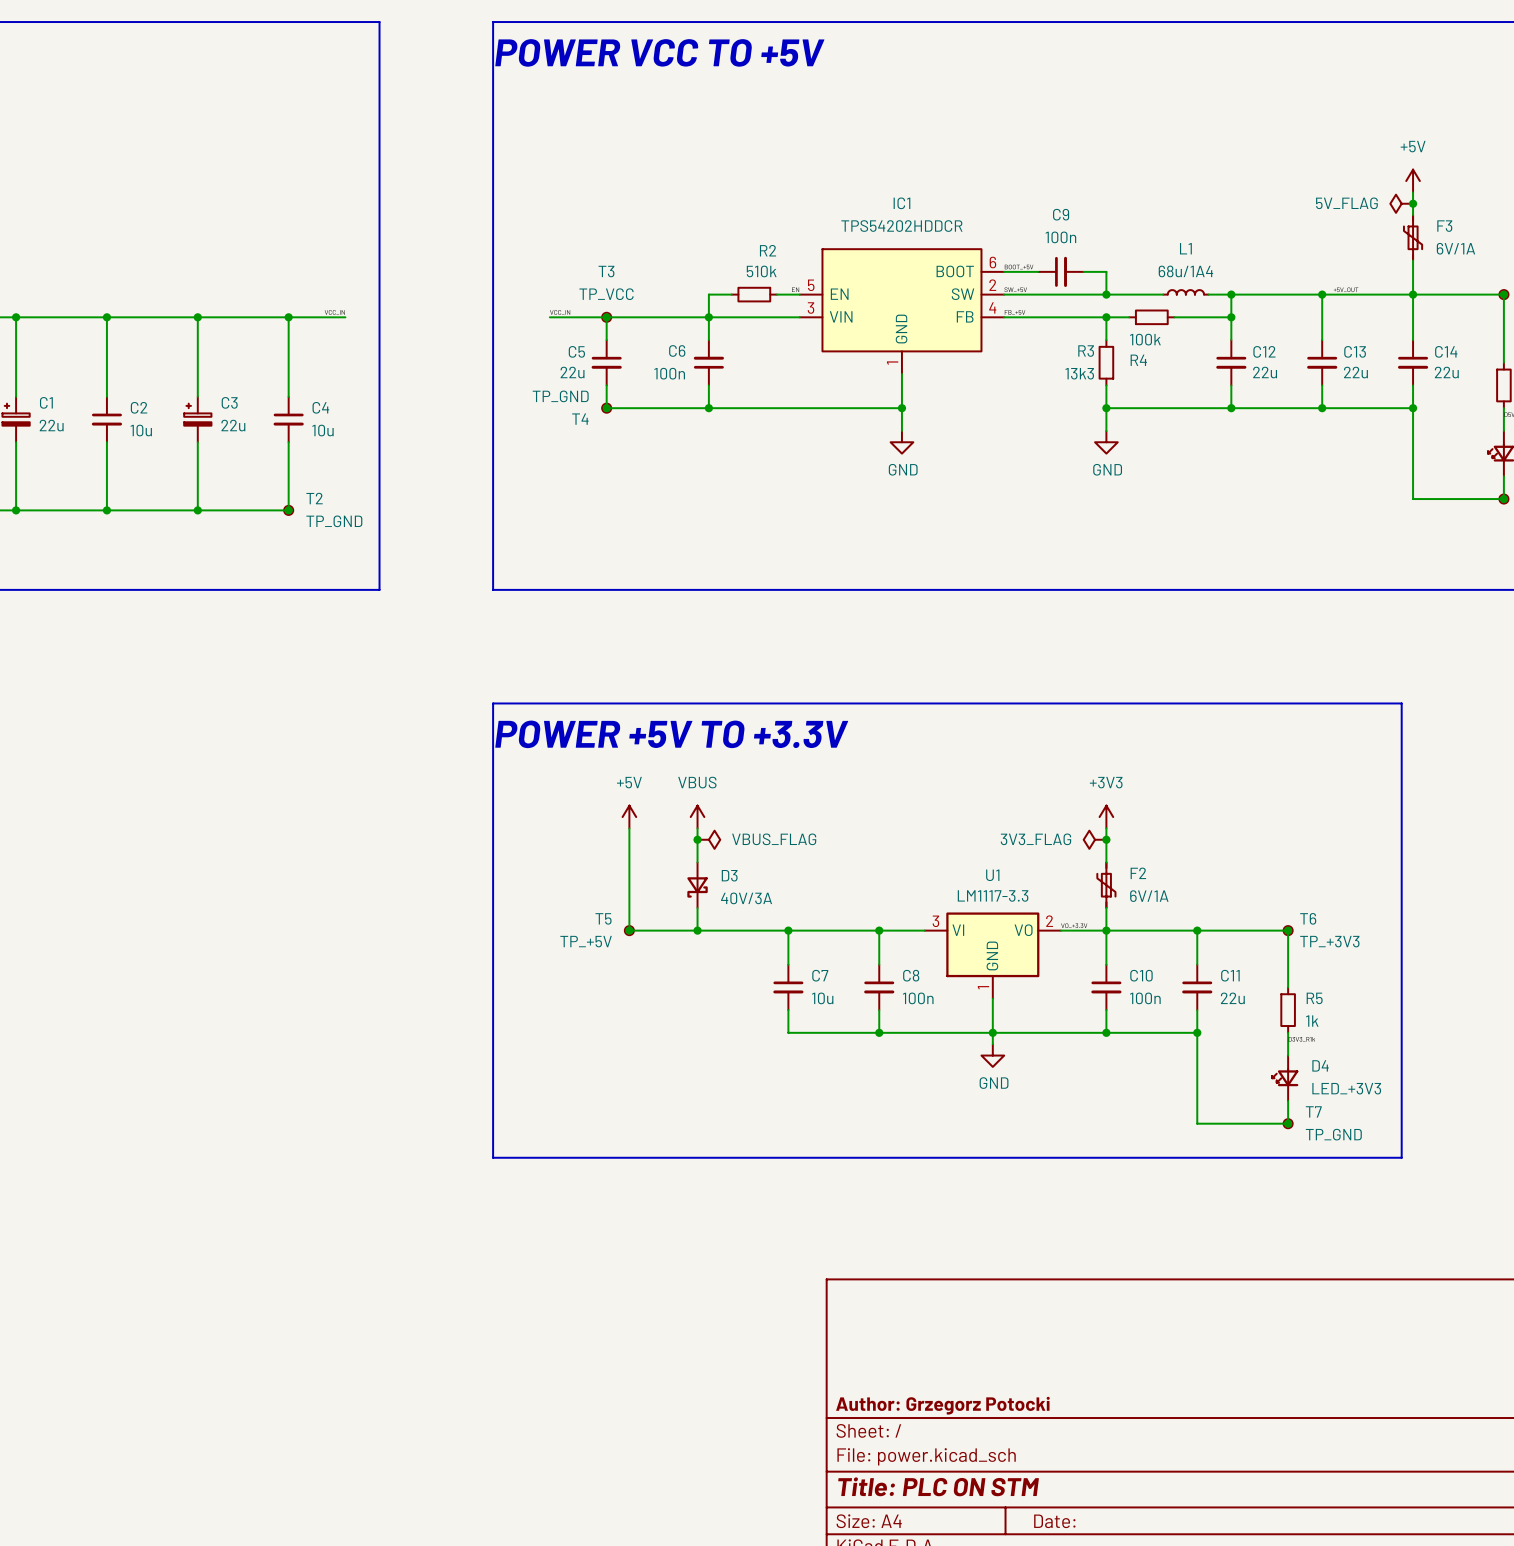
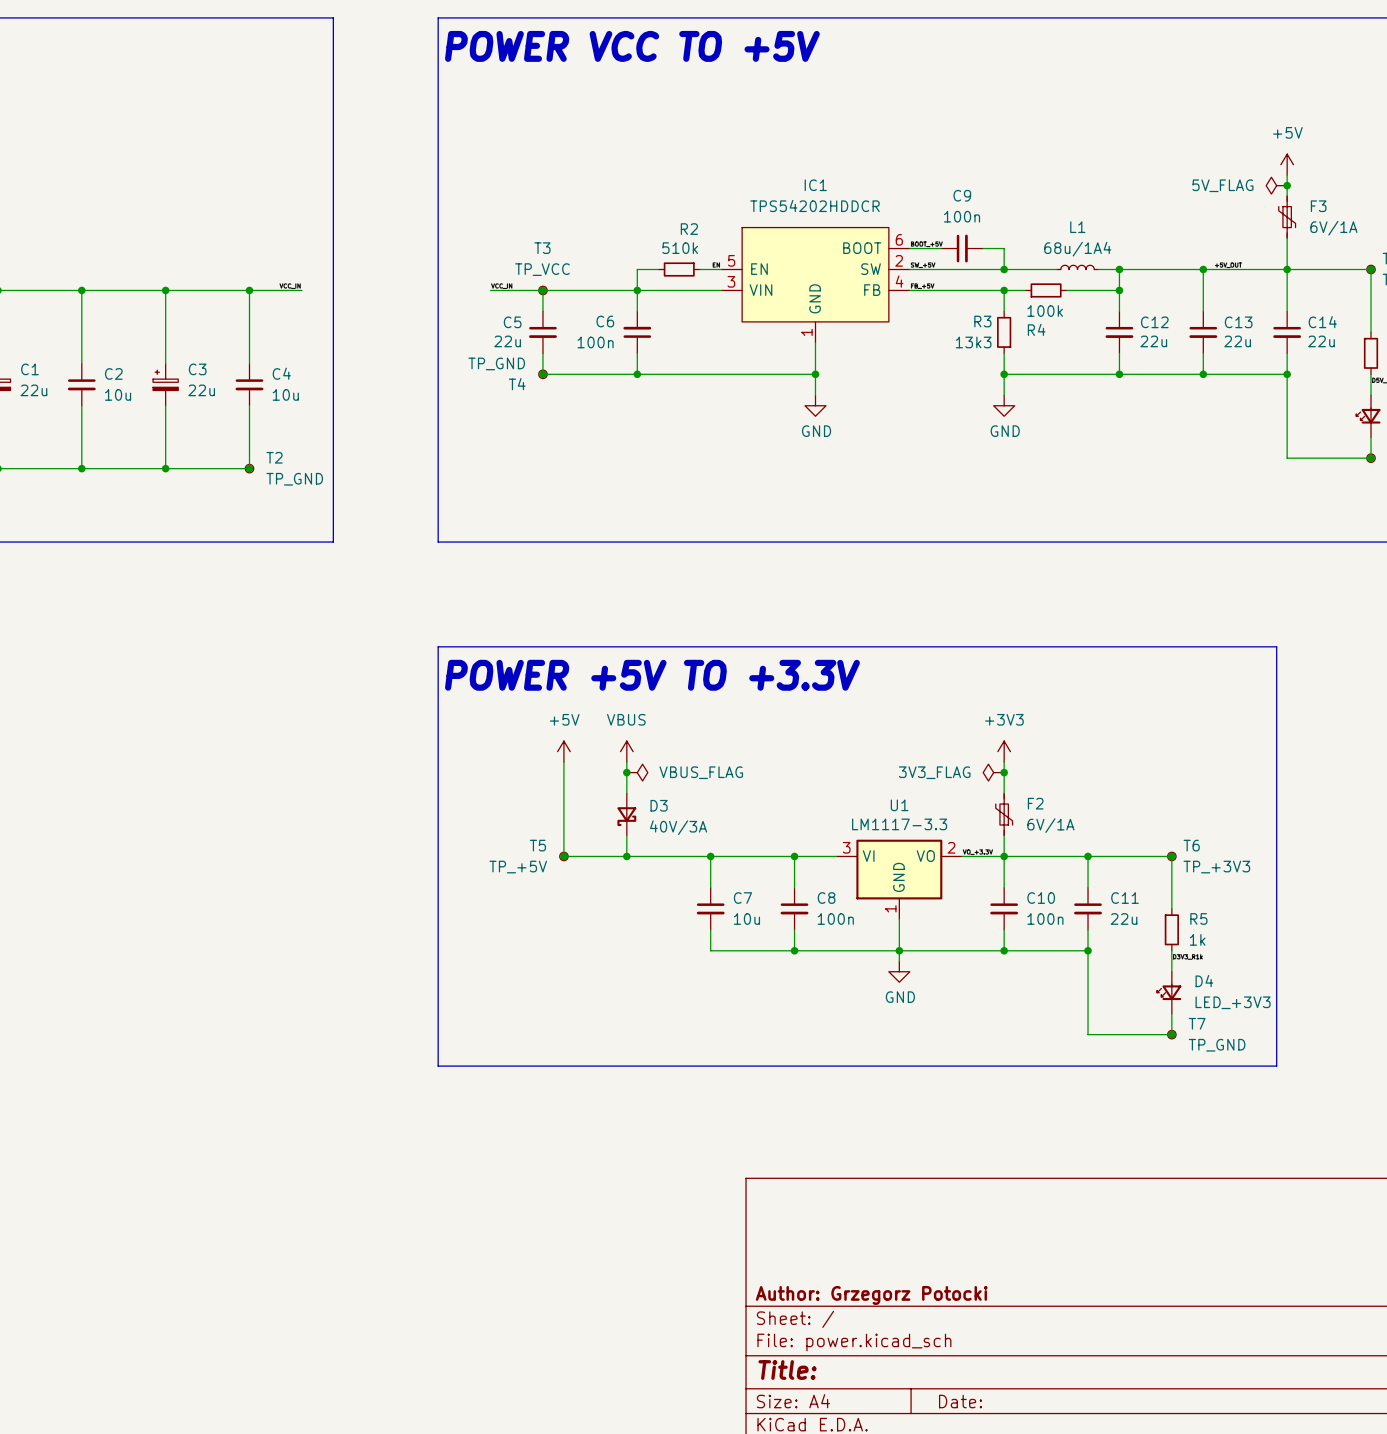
title block: Title: PLC ON STM (938, 1486) -> Title: (787, 1370)

